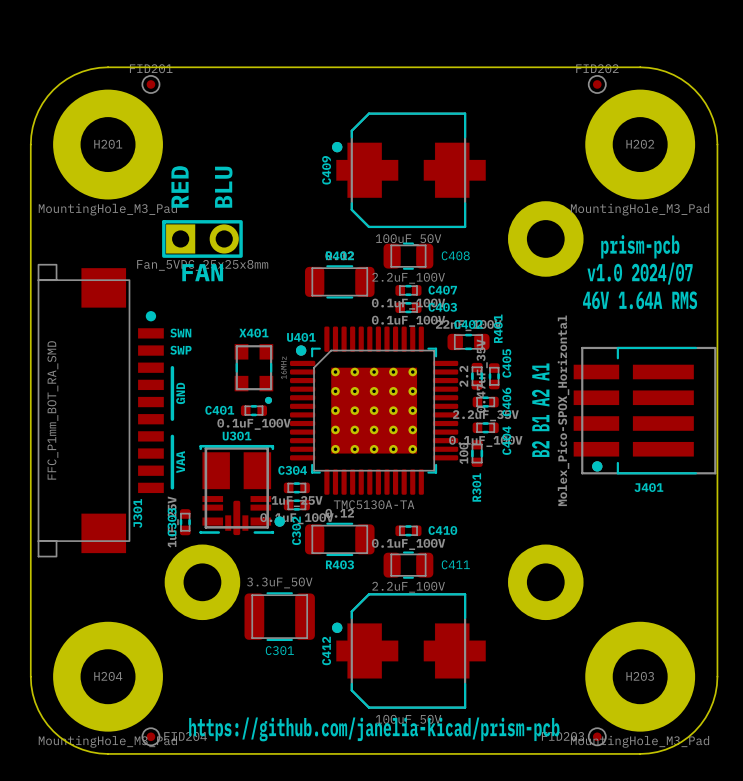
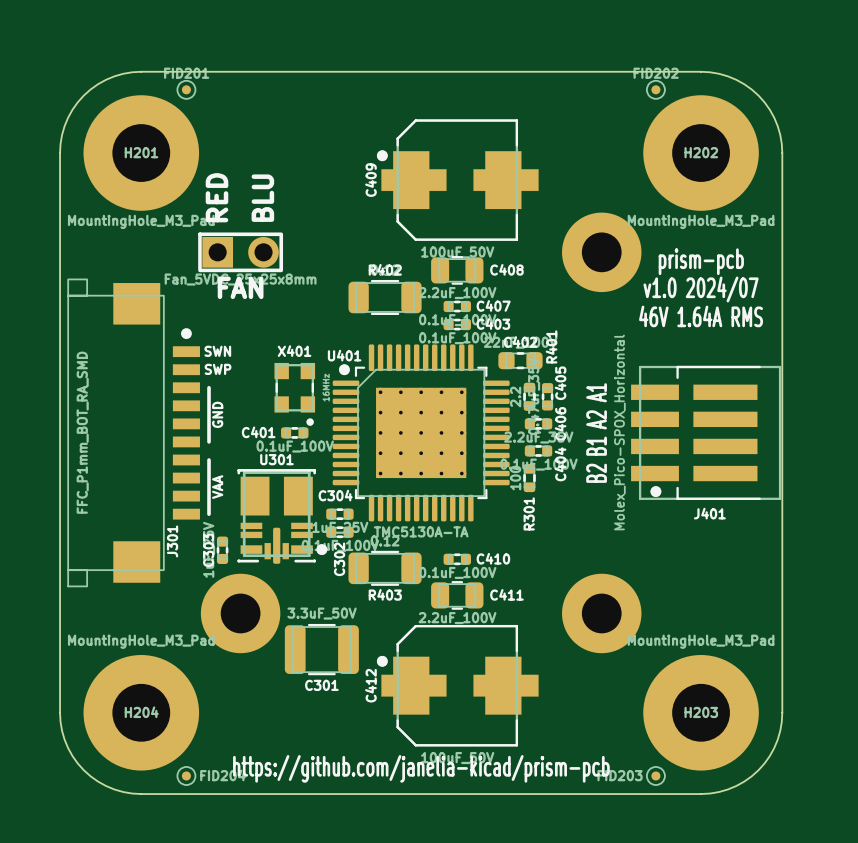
H204 value position: MountingHole_M3_Pad (107, 741) -> MountingHole_M3_Pad (141, 641)
H203 value position: MountingHole_M3_Pad (640, 741) -> MountingHole_M3_Pad (701, 641)

